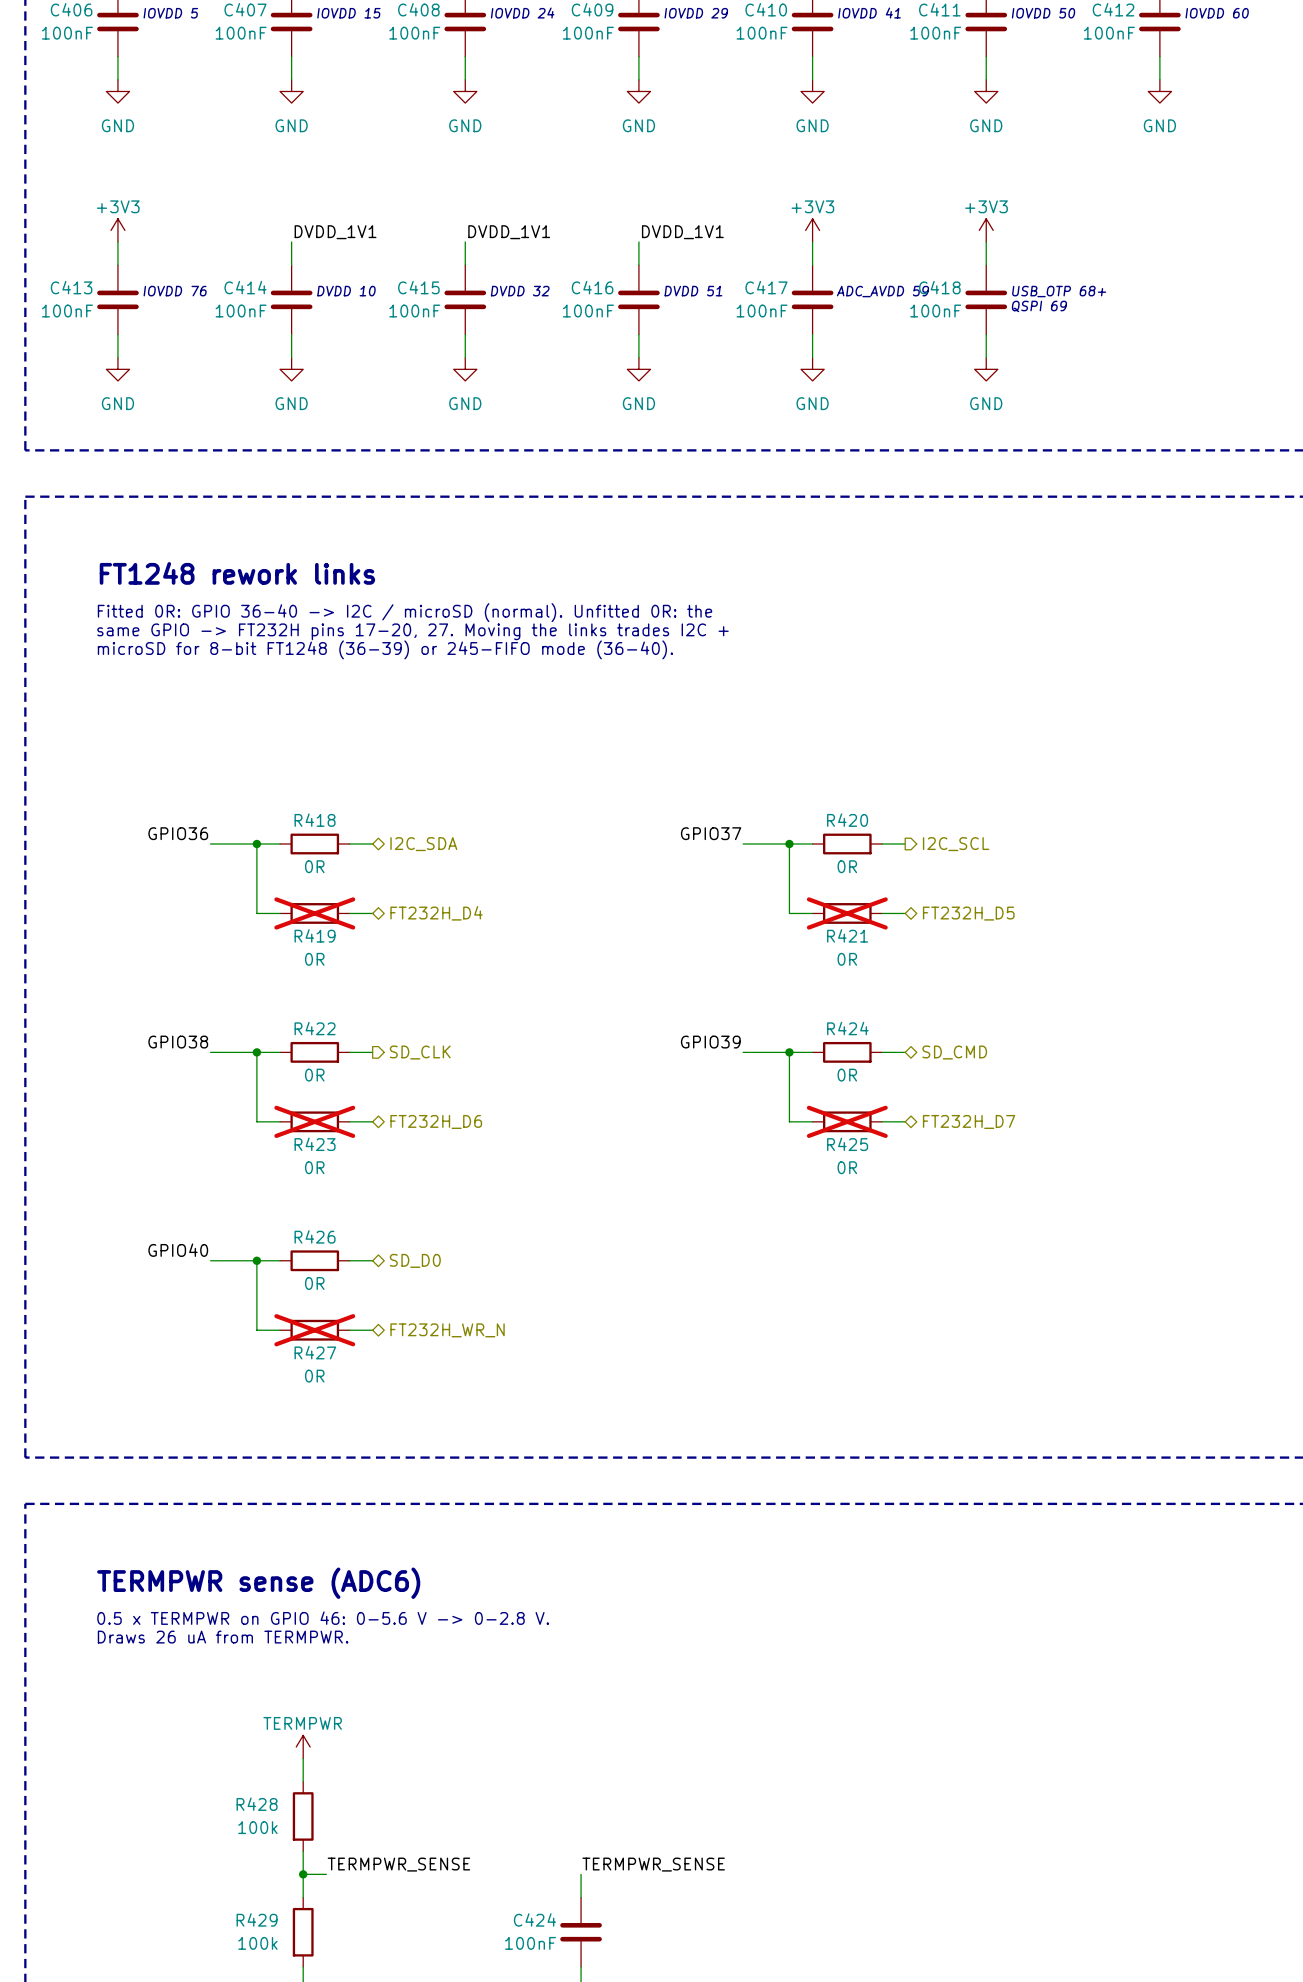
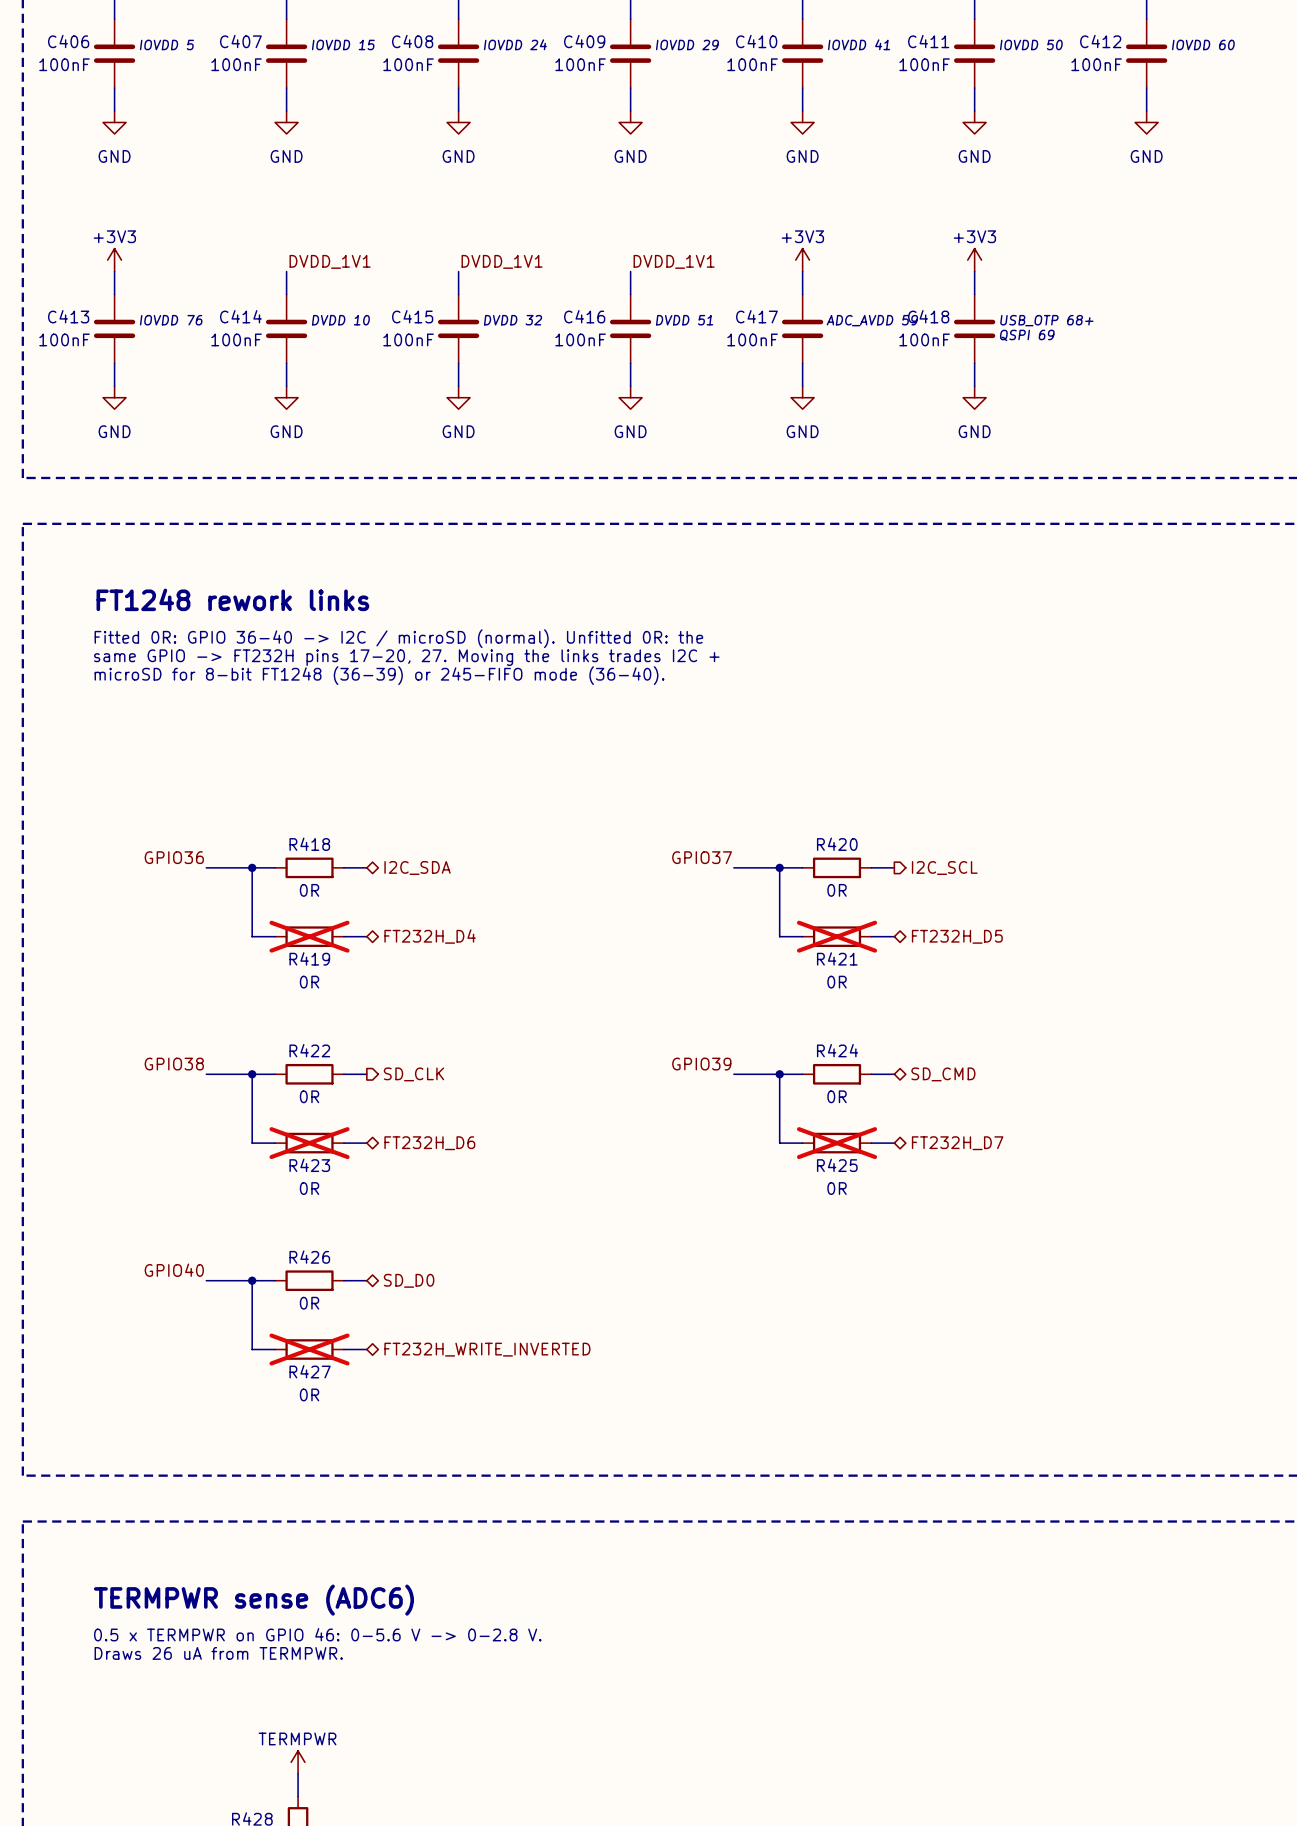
hierarchical label: FT232H_WR_N (447, 1330) -> FT232H_WRITE_INVERTED (487, 1349)

